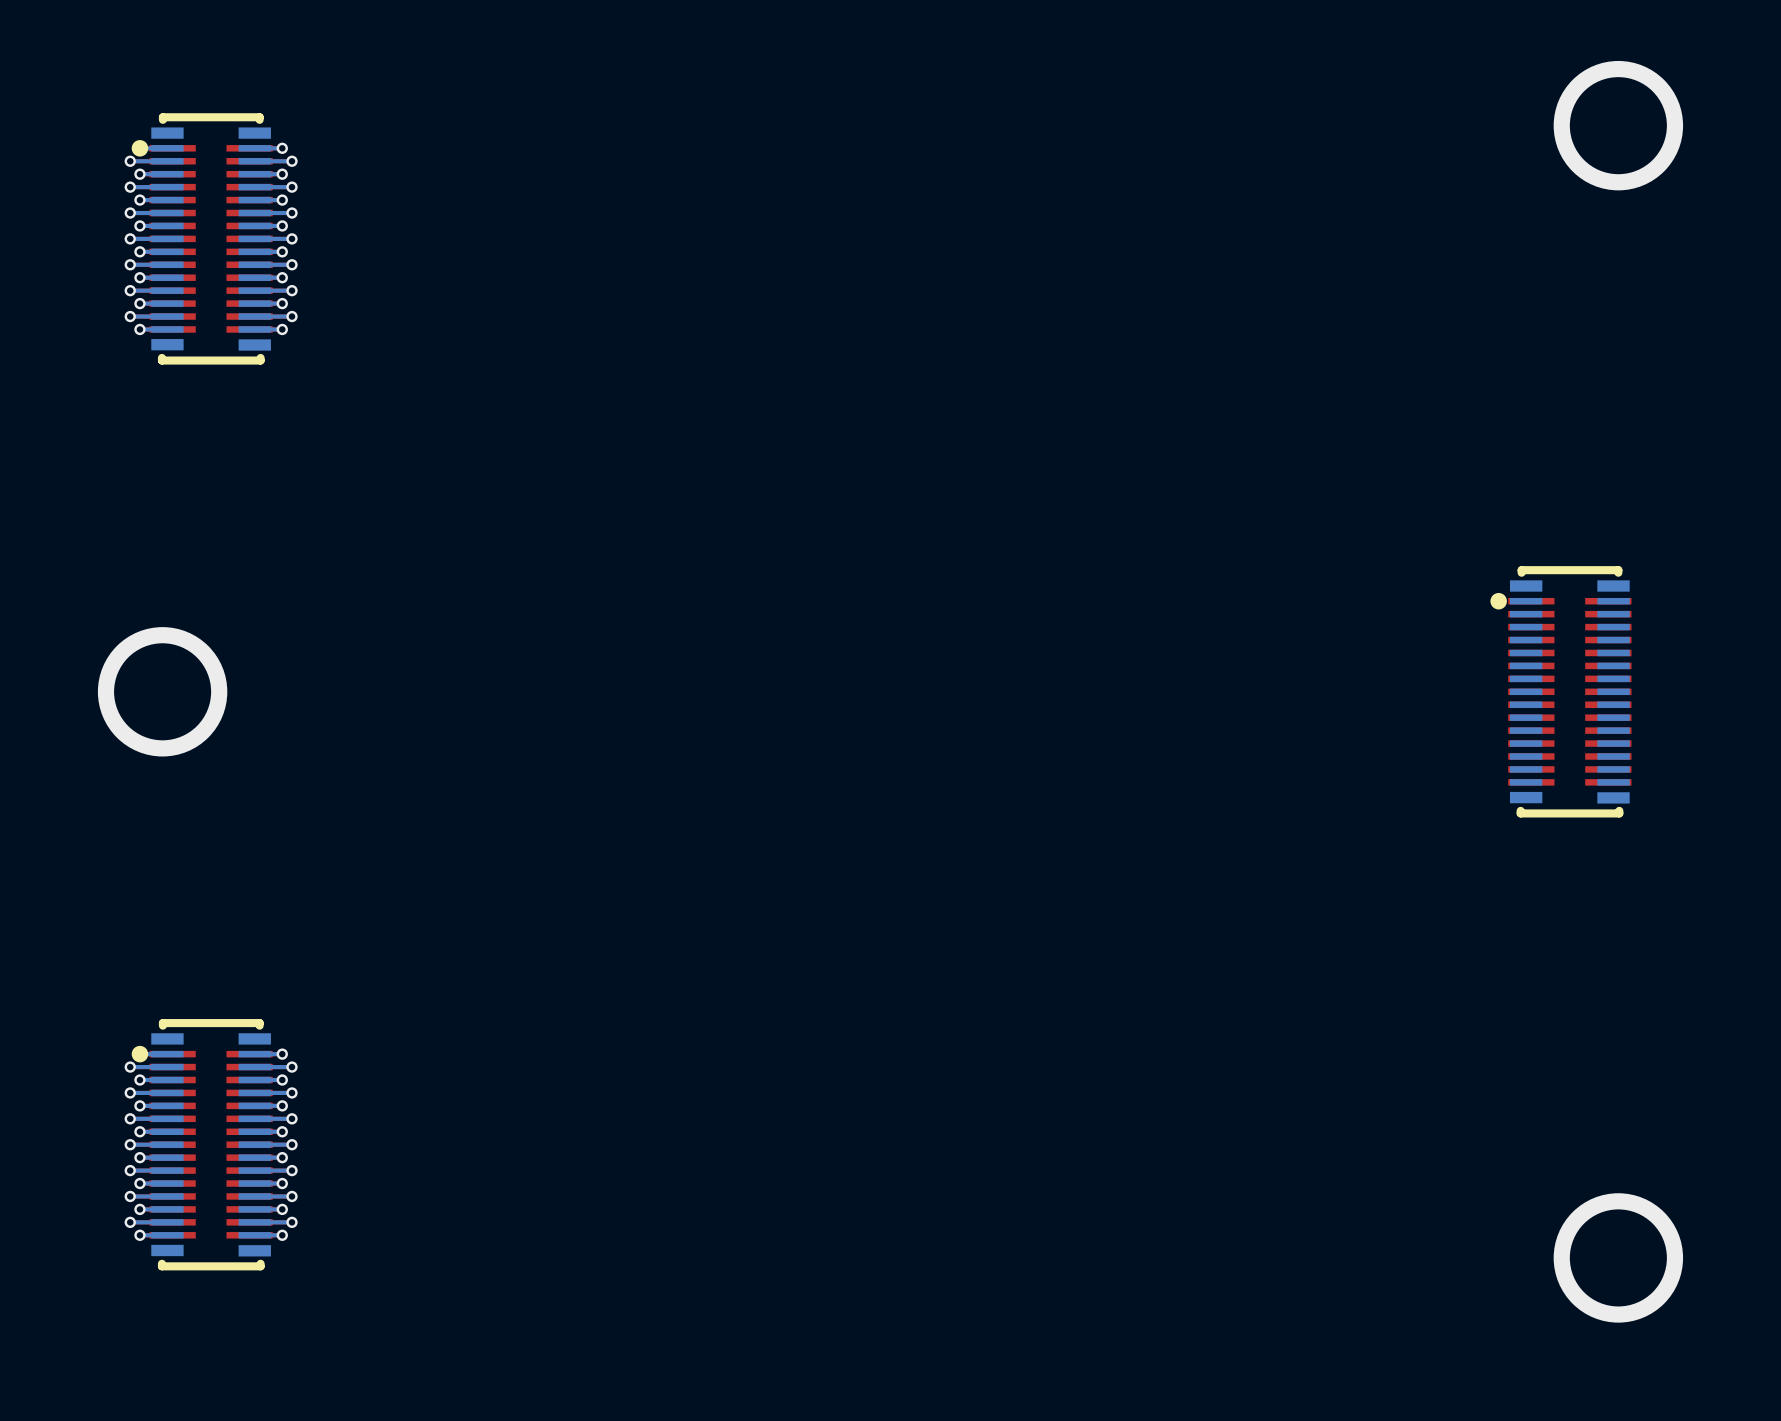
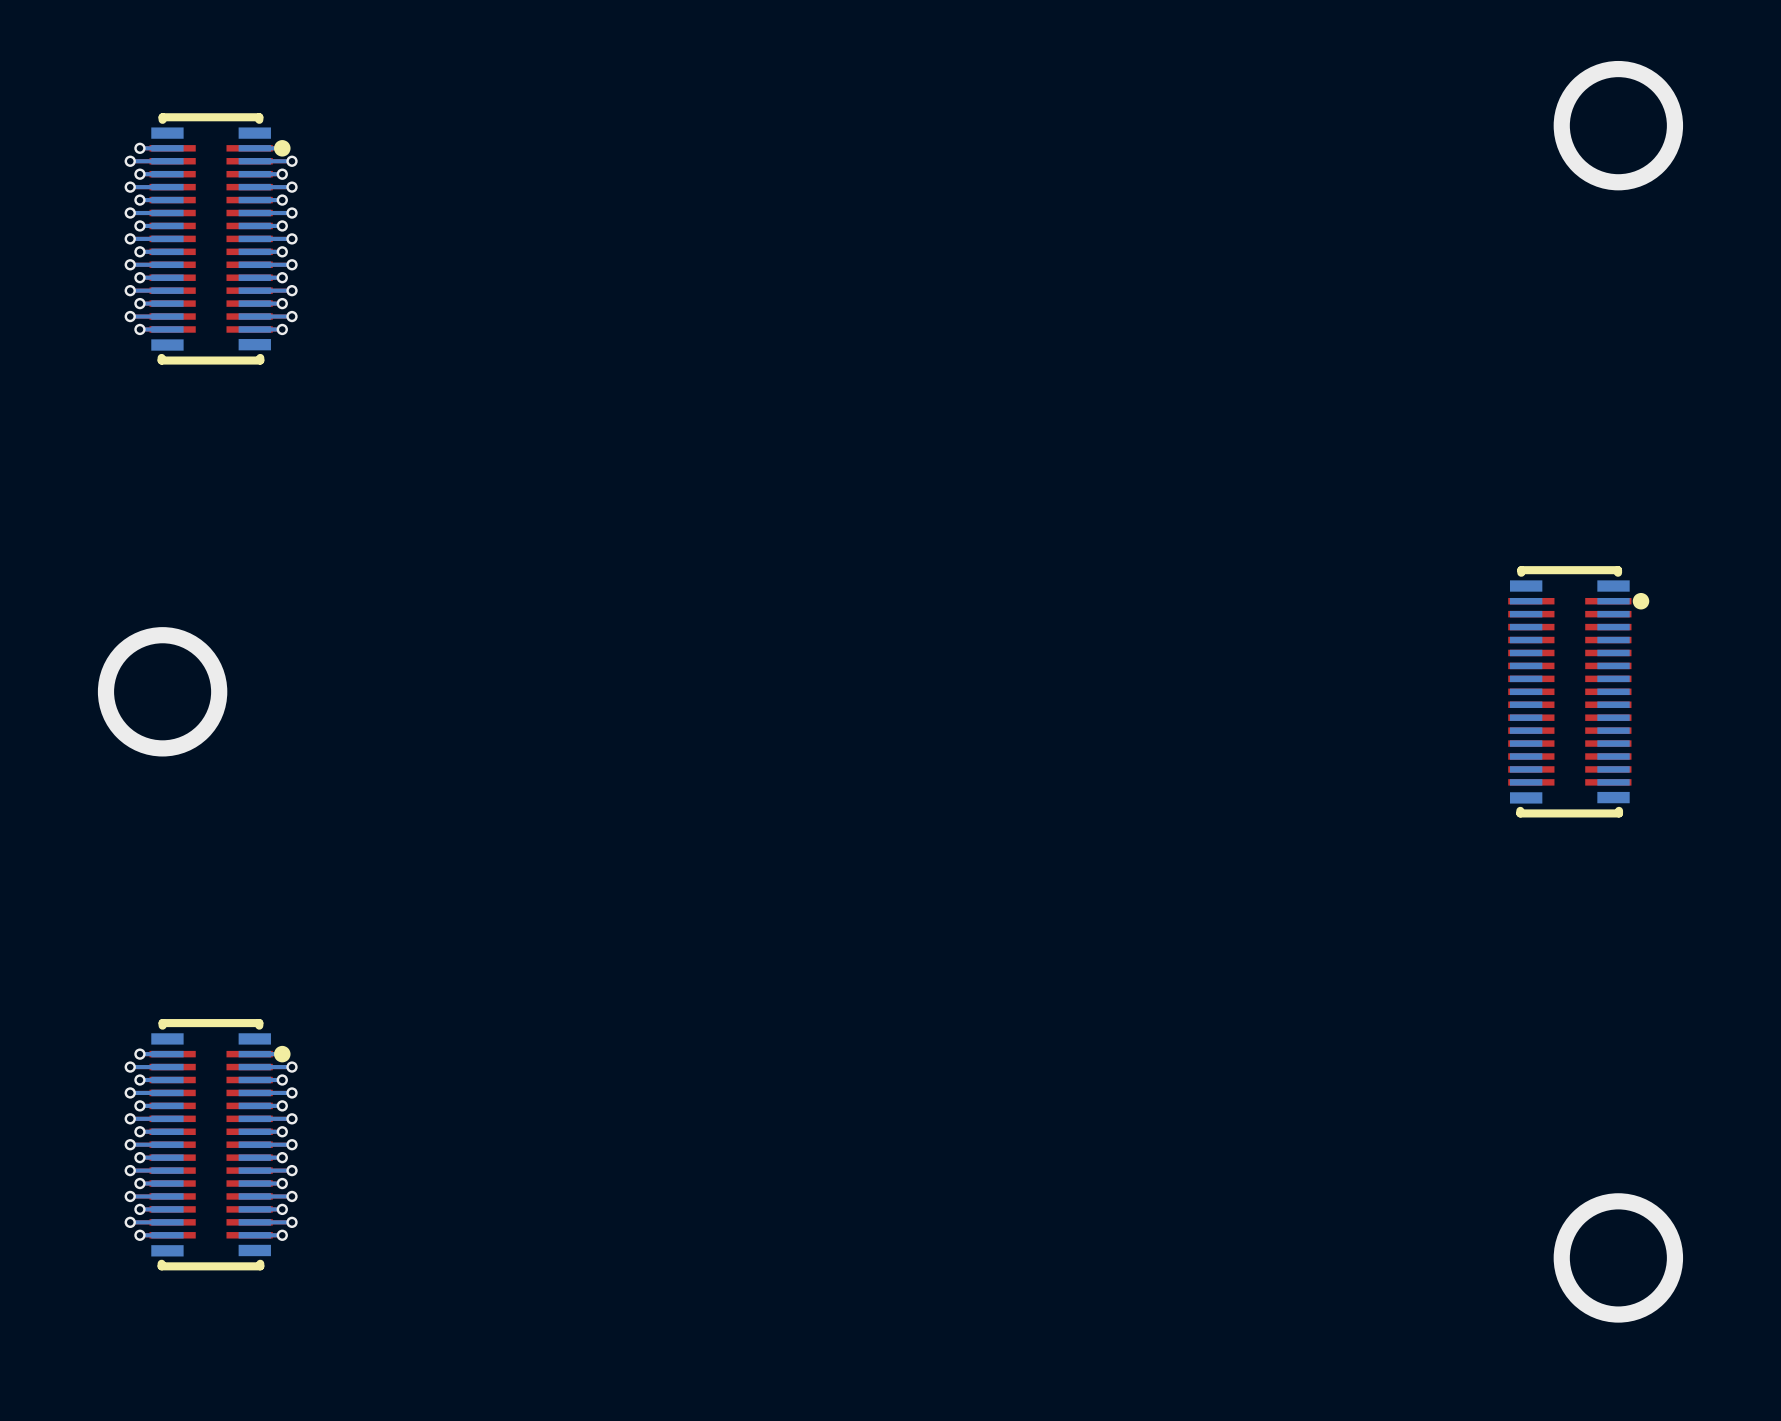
part footprint: [131, 113, 271, 365] -> [151, 113, 291, 365]
part footprint: [1490, 566, 1630, 818] -> [1509, 566, 1650, 818]
part footprint: [131, 1019, 271, 1271] -> [151, 1019, 291, 1271]

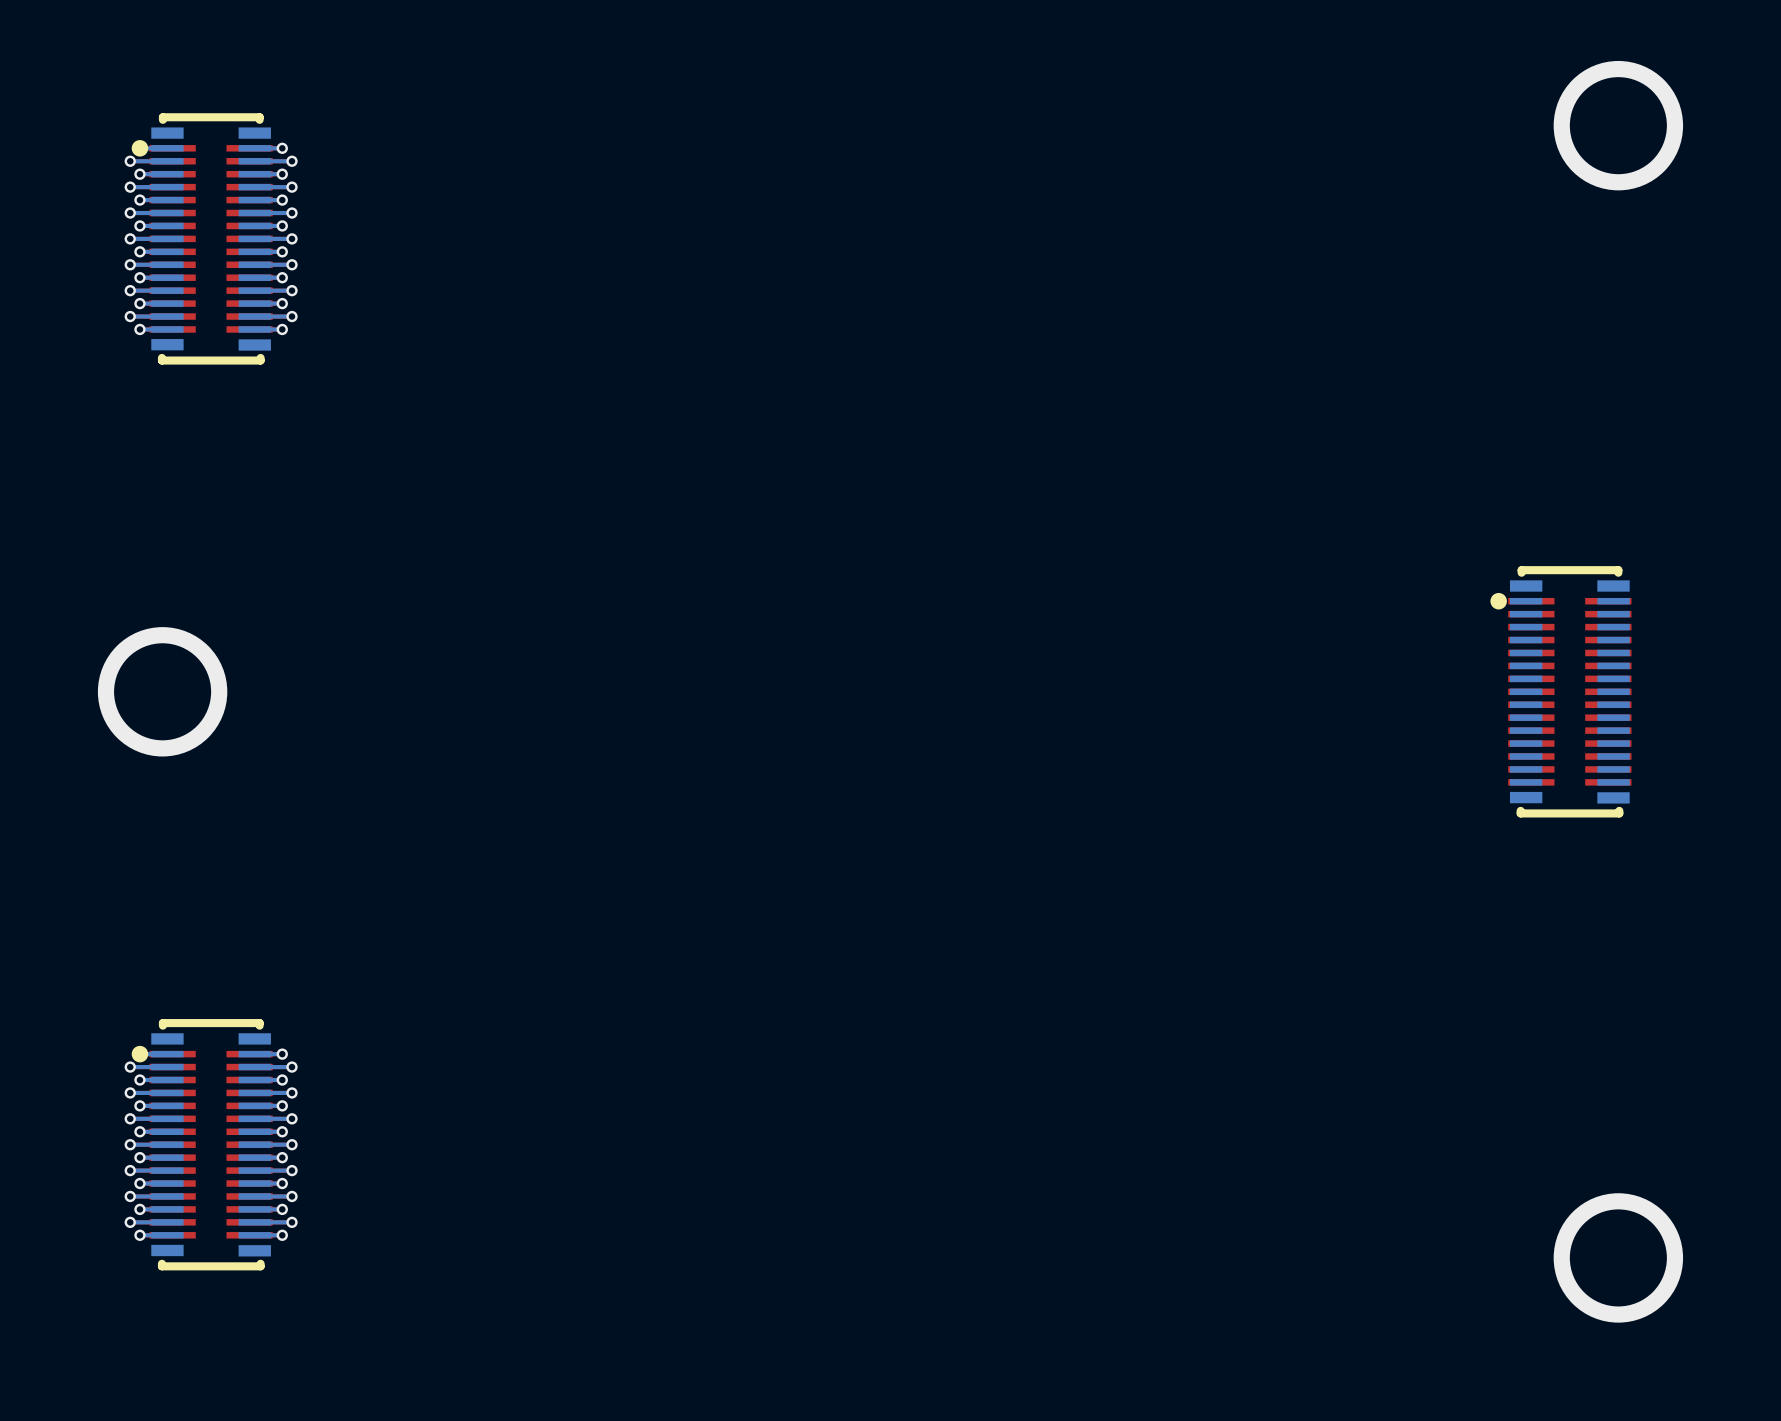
part footprint: [151, 113, 291, 365] -> [131, 113, 271, 365]
part footprint: [1509, 566, 1650, 818] -> [1490, 566, 1630, 818]
part footprint: [151, 1019, 291, 1271] -> [131, 1019, 271, 1271]

